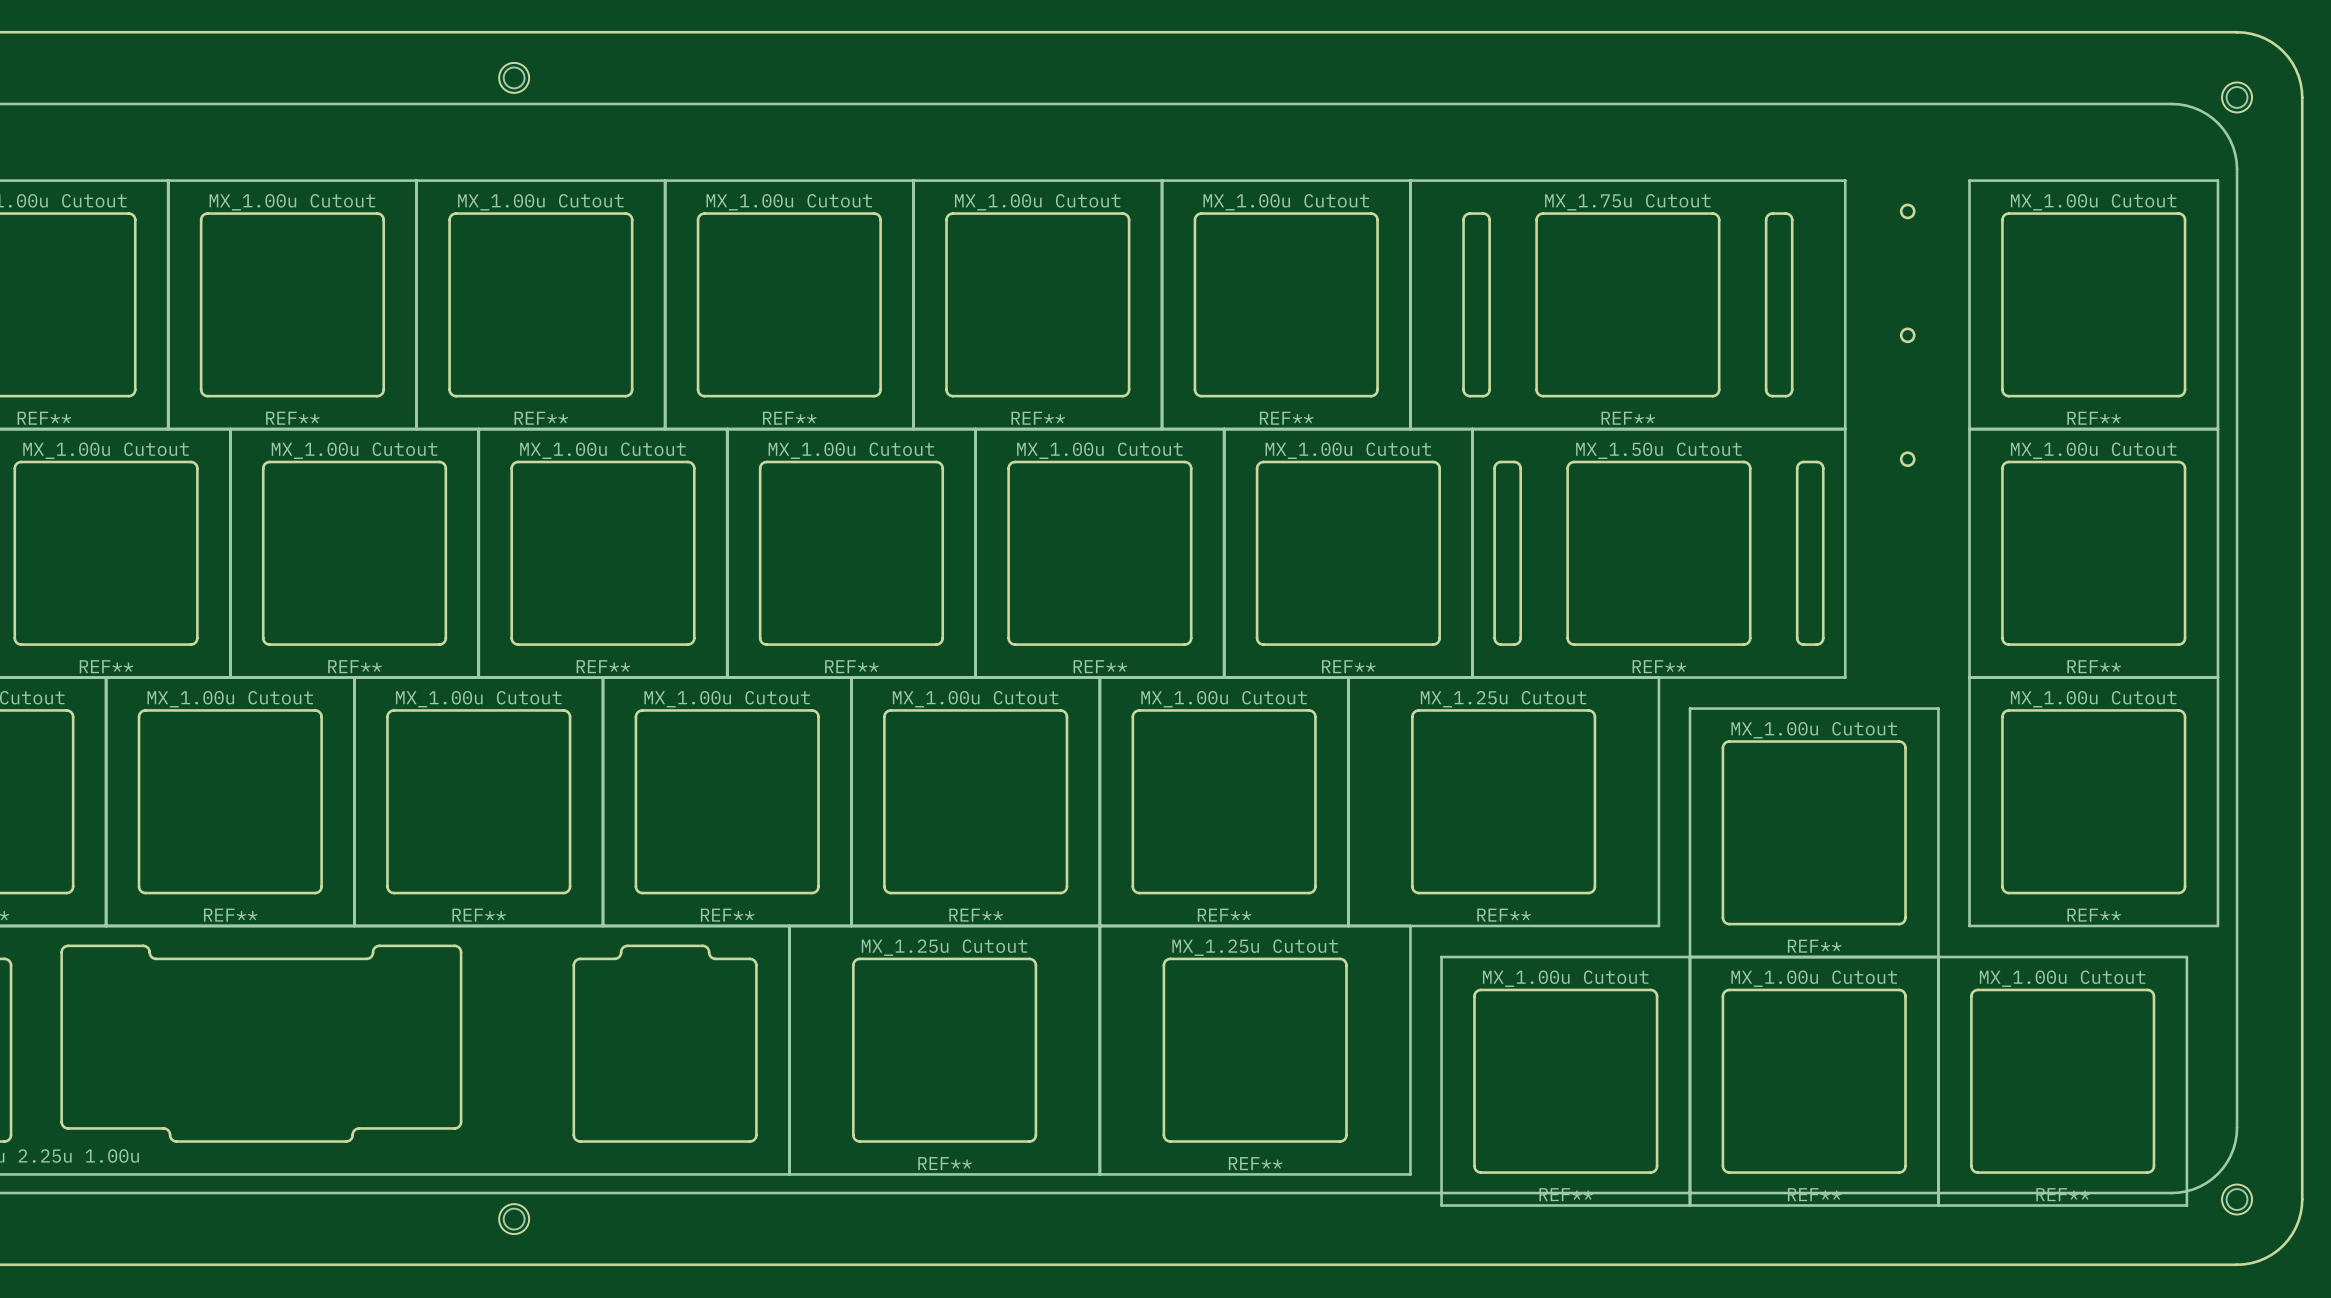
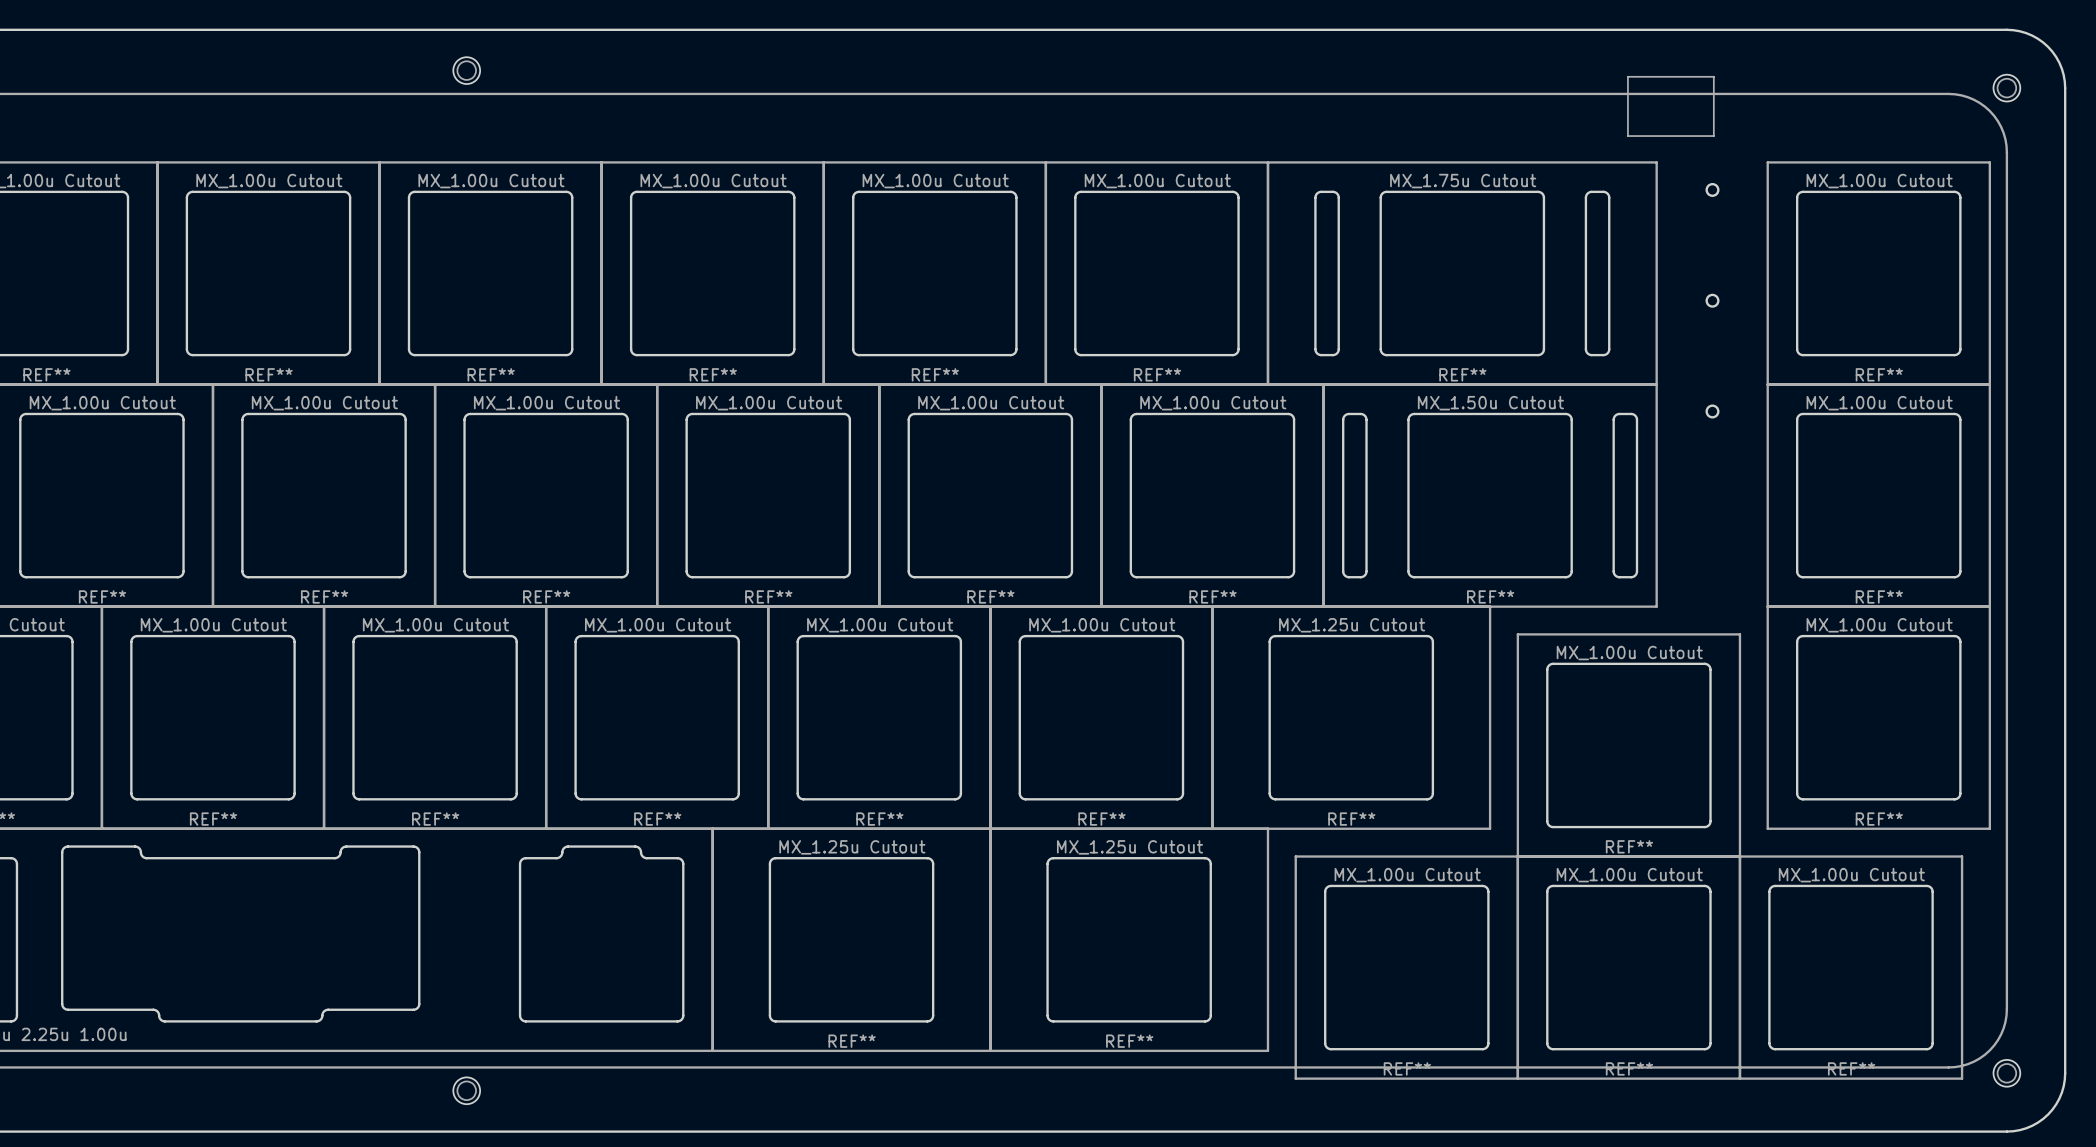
line: none -> (1627, 76) (1713, 76) (1713, 136) (1627, 136) (1627, 76)

